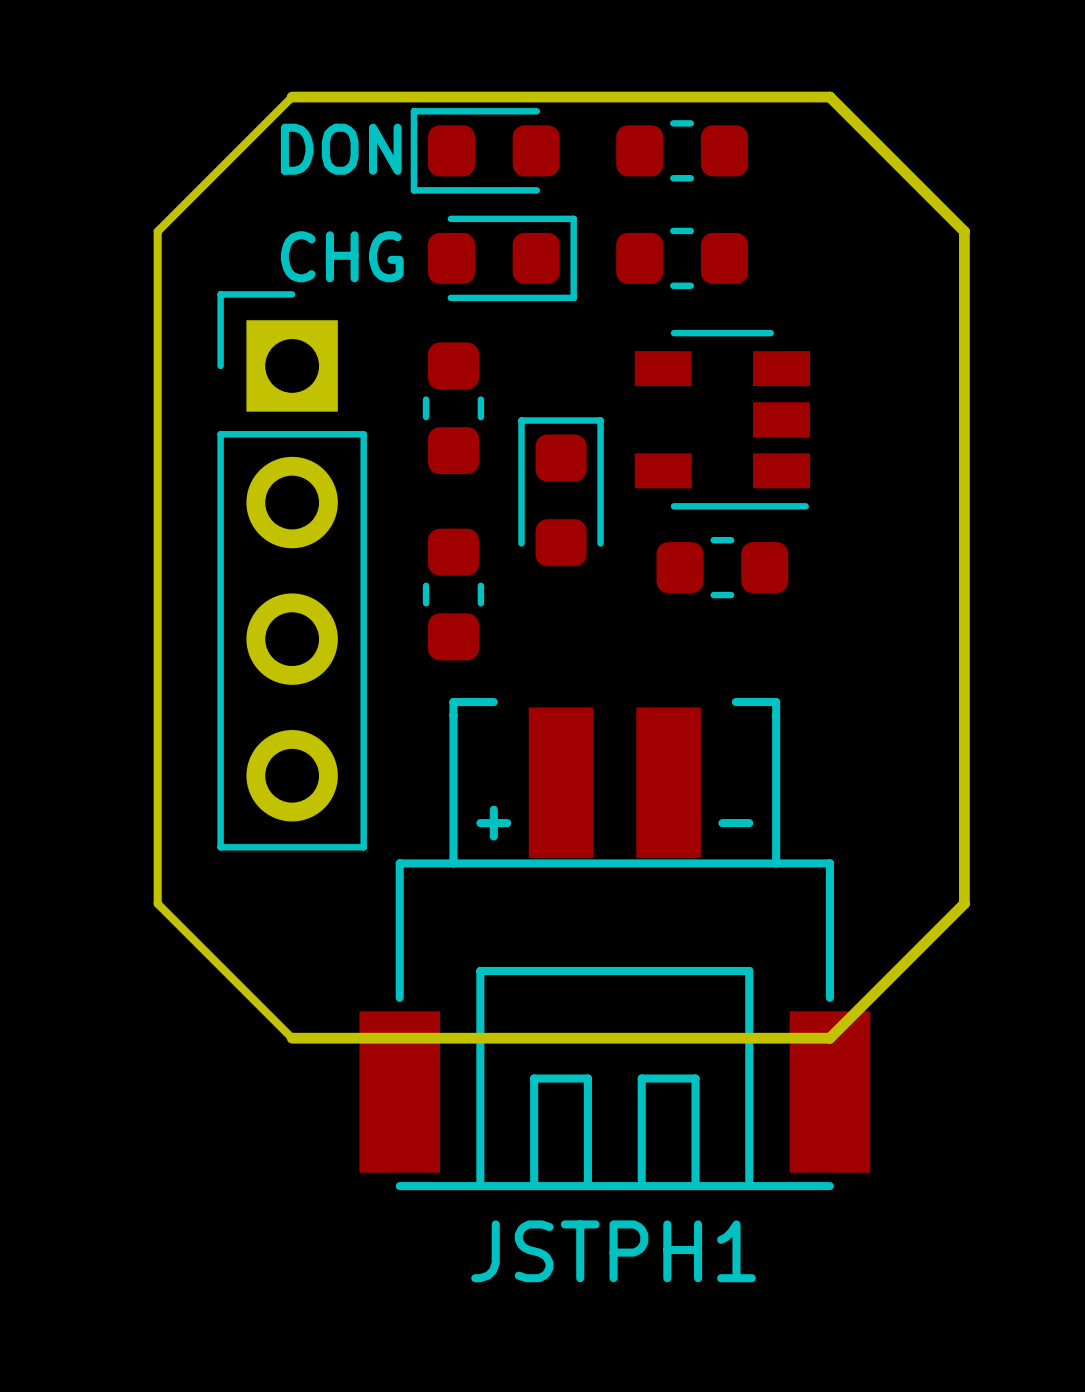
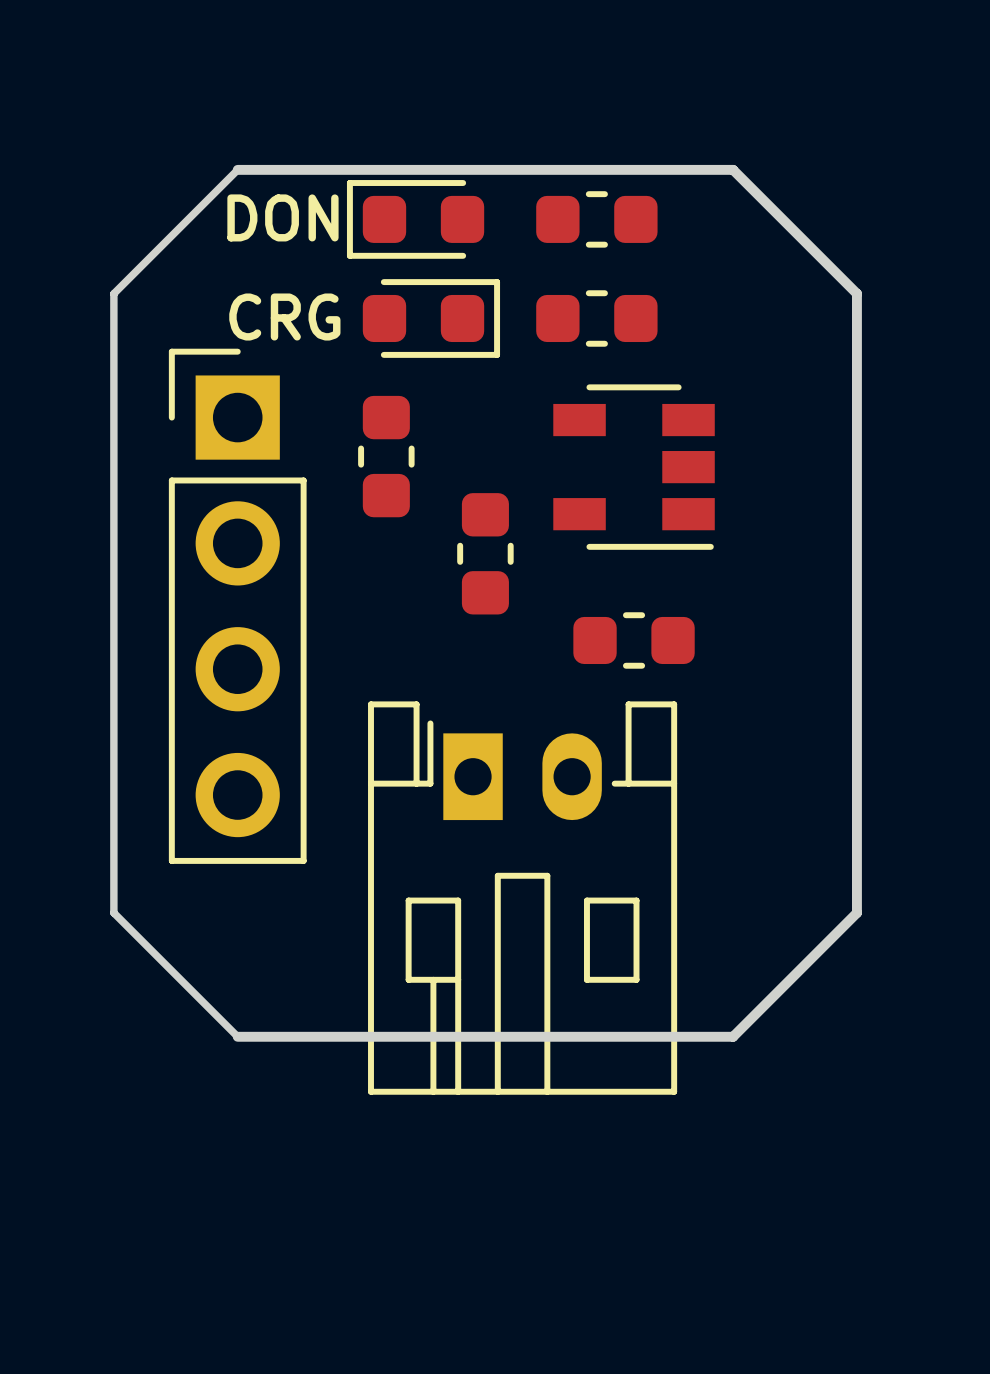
text: CHG (342, 256) -> CRG (284, 317)
part footprint: [518, 417, 604, 567] -> [457, 493, 514, 615]
part position: (722, 567) -> (634, 640)
part: (453, 594) -> none
part: none -> (522, 898)
JSTPH1: (614, 944) -> none

